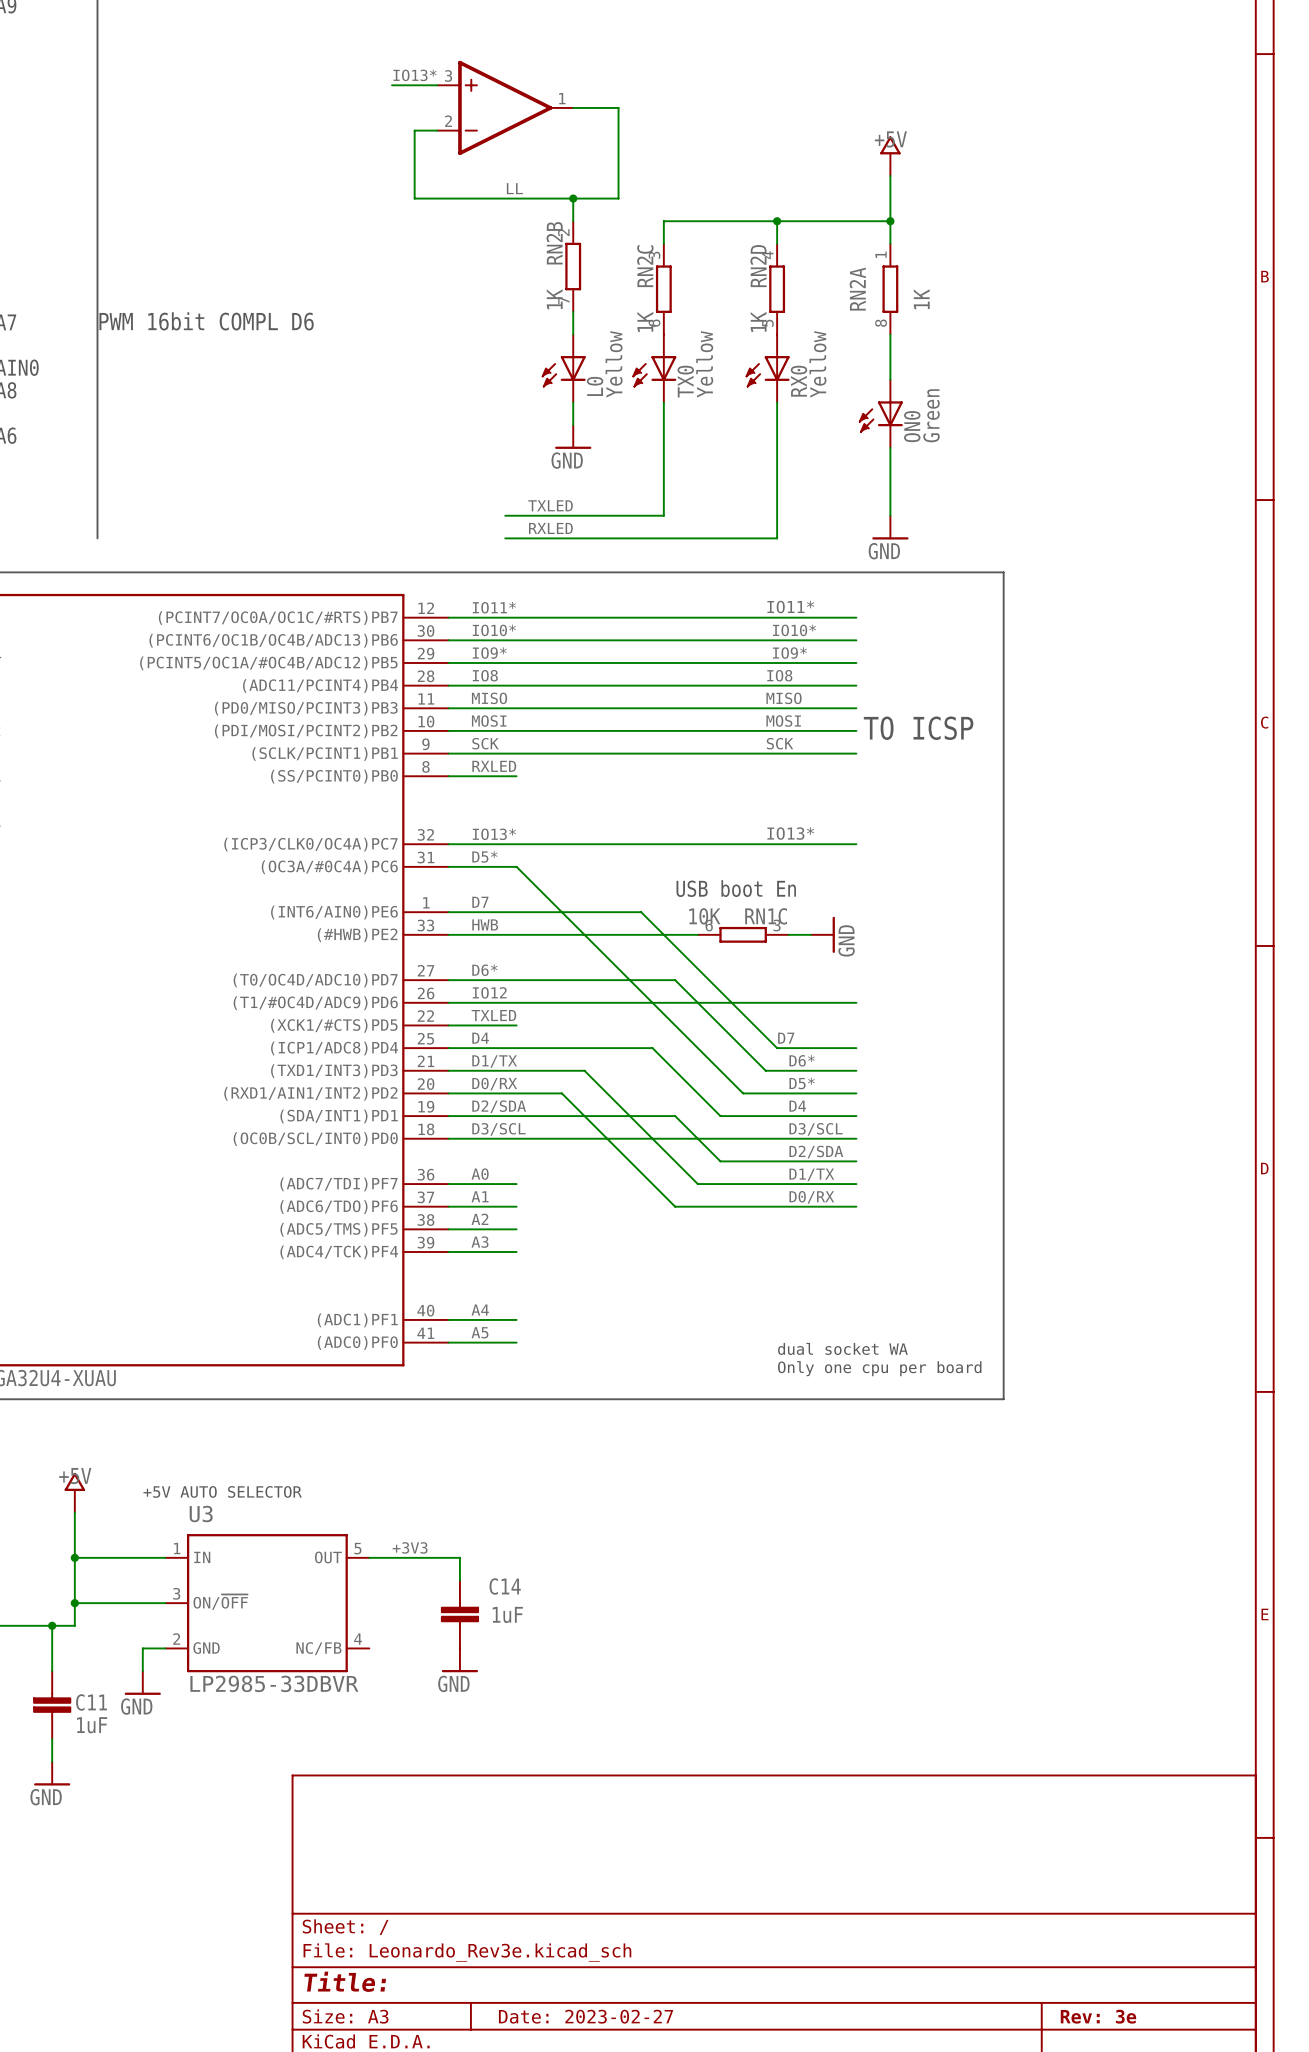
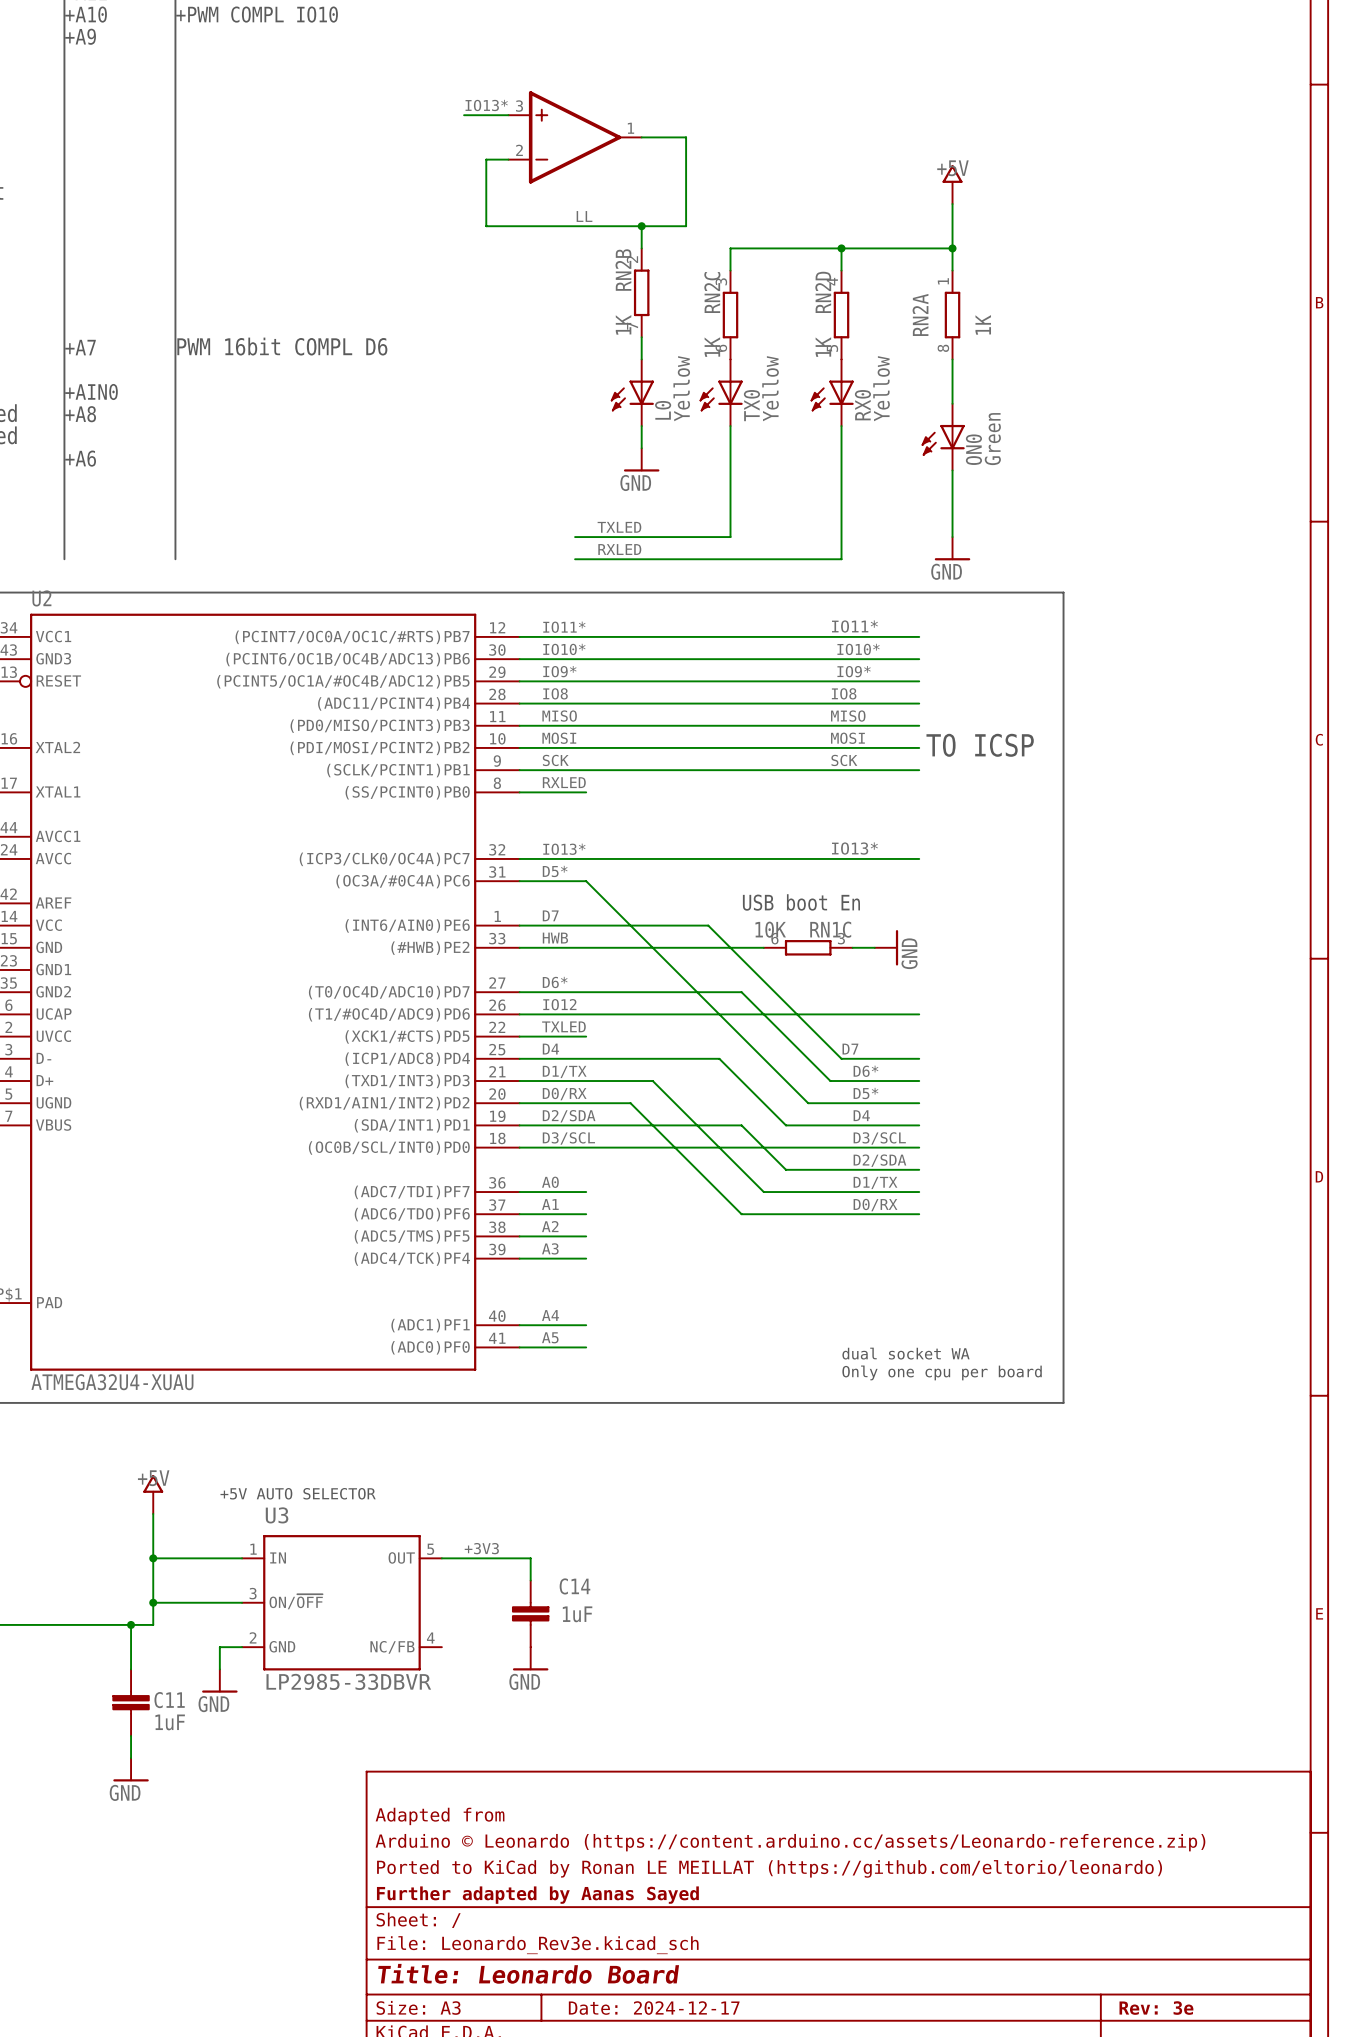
title block: none -> Adapted from (440, 1816)
title block: none -> Arduino © Leonardo (https://content.arduino.cc/assets/Leonardo-reference.zip) (790, 1842)
title block: none -> Ported to KiCad by Ronan LE MEILLAT (https://github.com/eltorio/leonardo) (769, 1868)
title block: none -> Further adapted by Aanas Sayed (537, 1895)
title block: Title: (345, 1981) -> Title: Leonardo Board (528, 1973)
title block: Date: 2023-02-27 (585, 2016) -> Date: 2024-12-17 (654, 2008)

